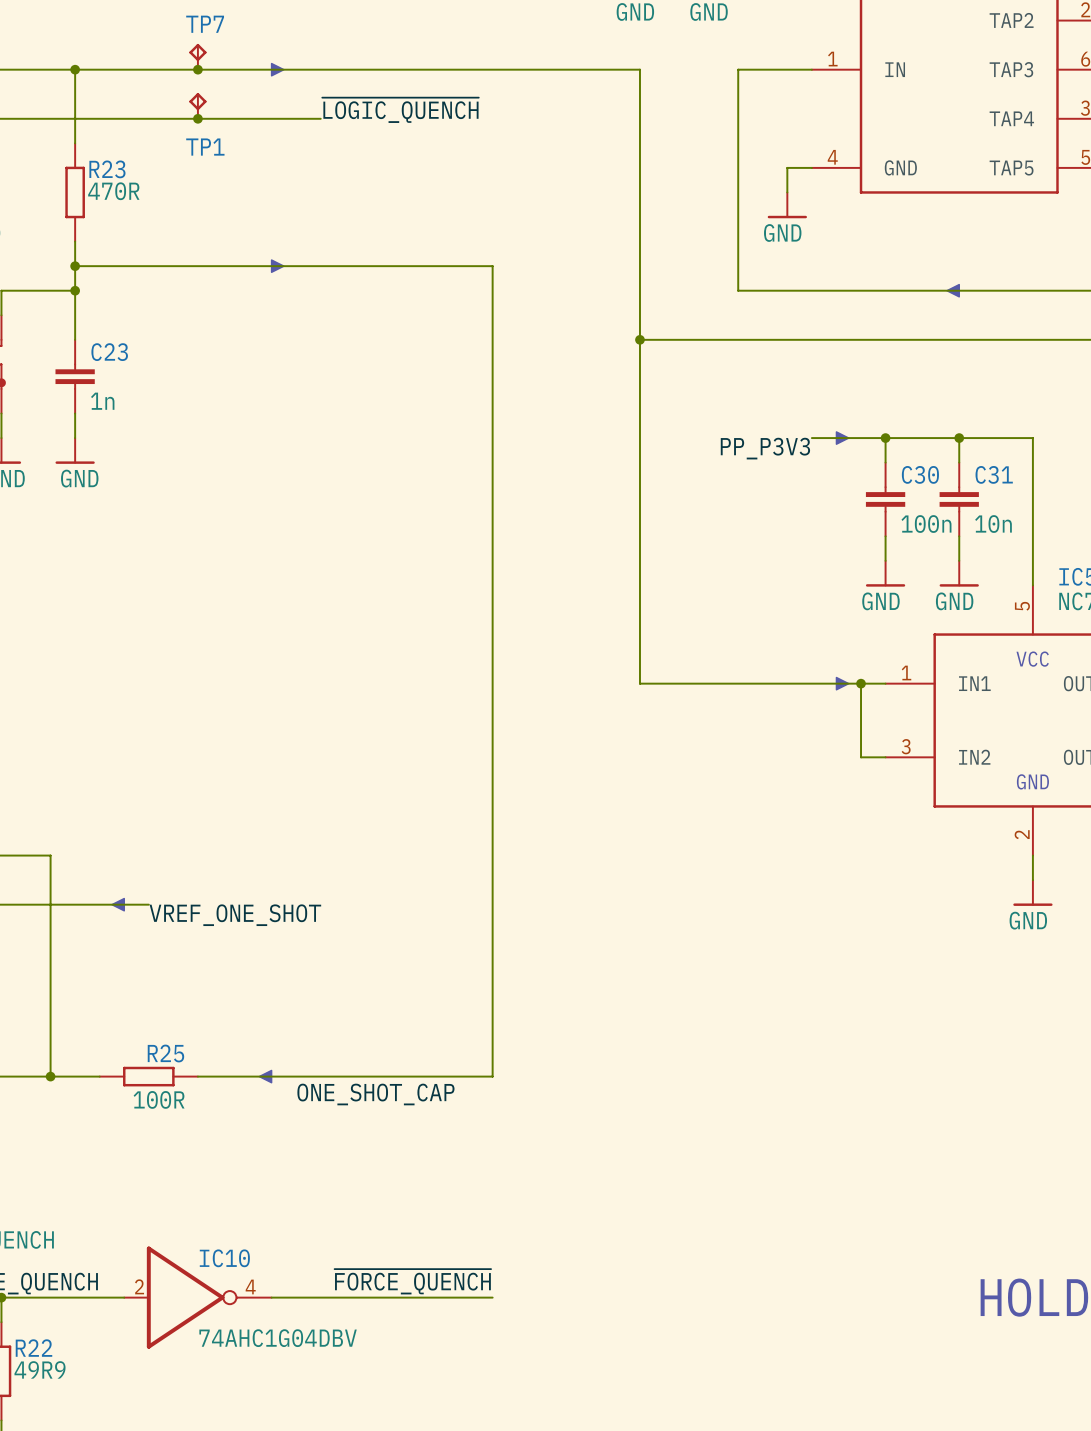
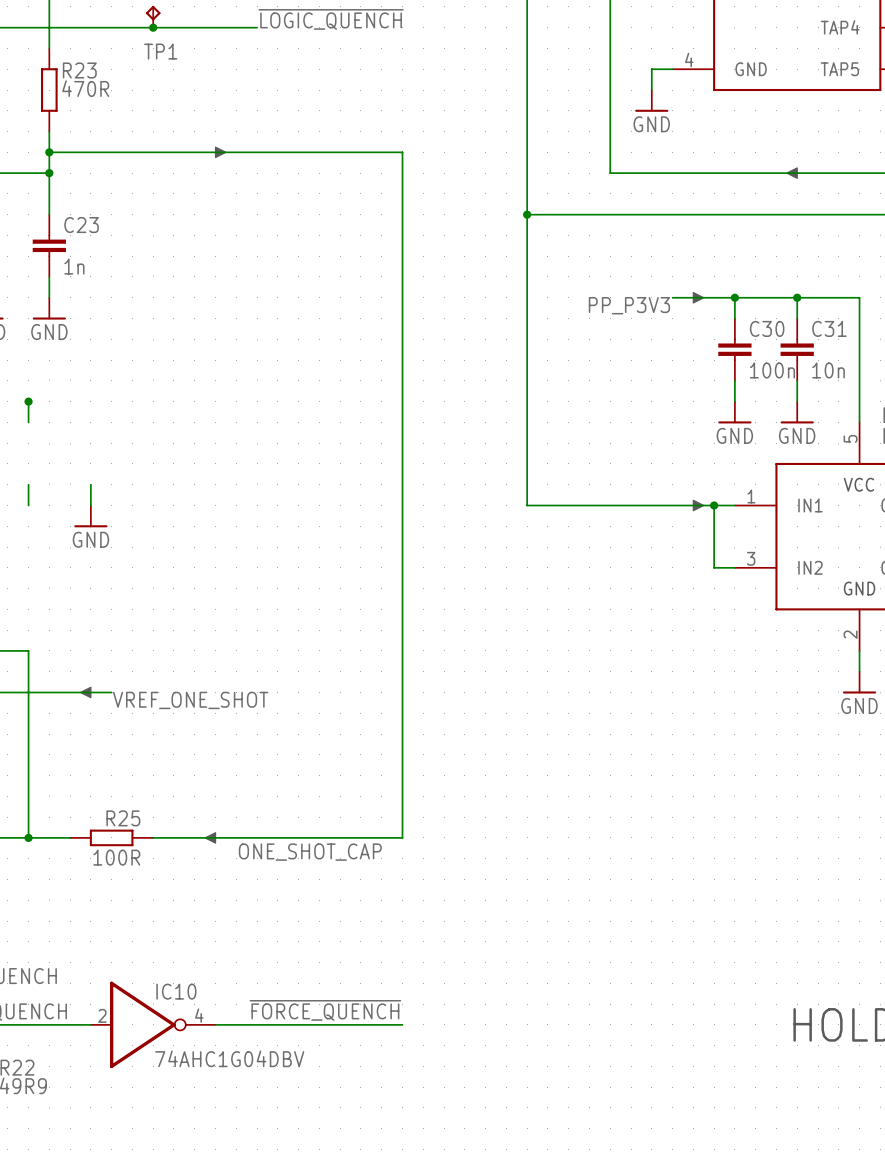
wire: none -> (28, 401) (28, 422)
junction: none -> (28, 401)
wire: none -> (28, 484) (28, 505)
wire: none -> (90, 484) (90, 505)
power symbol: none -> GND (90, 516)

